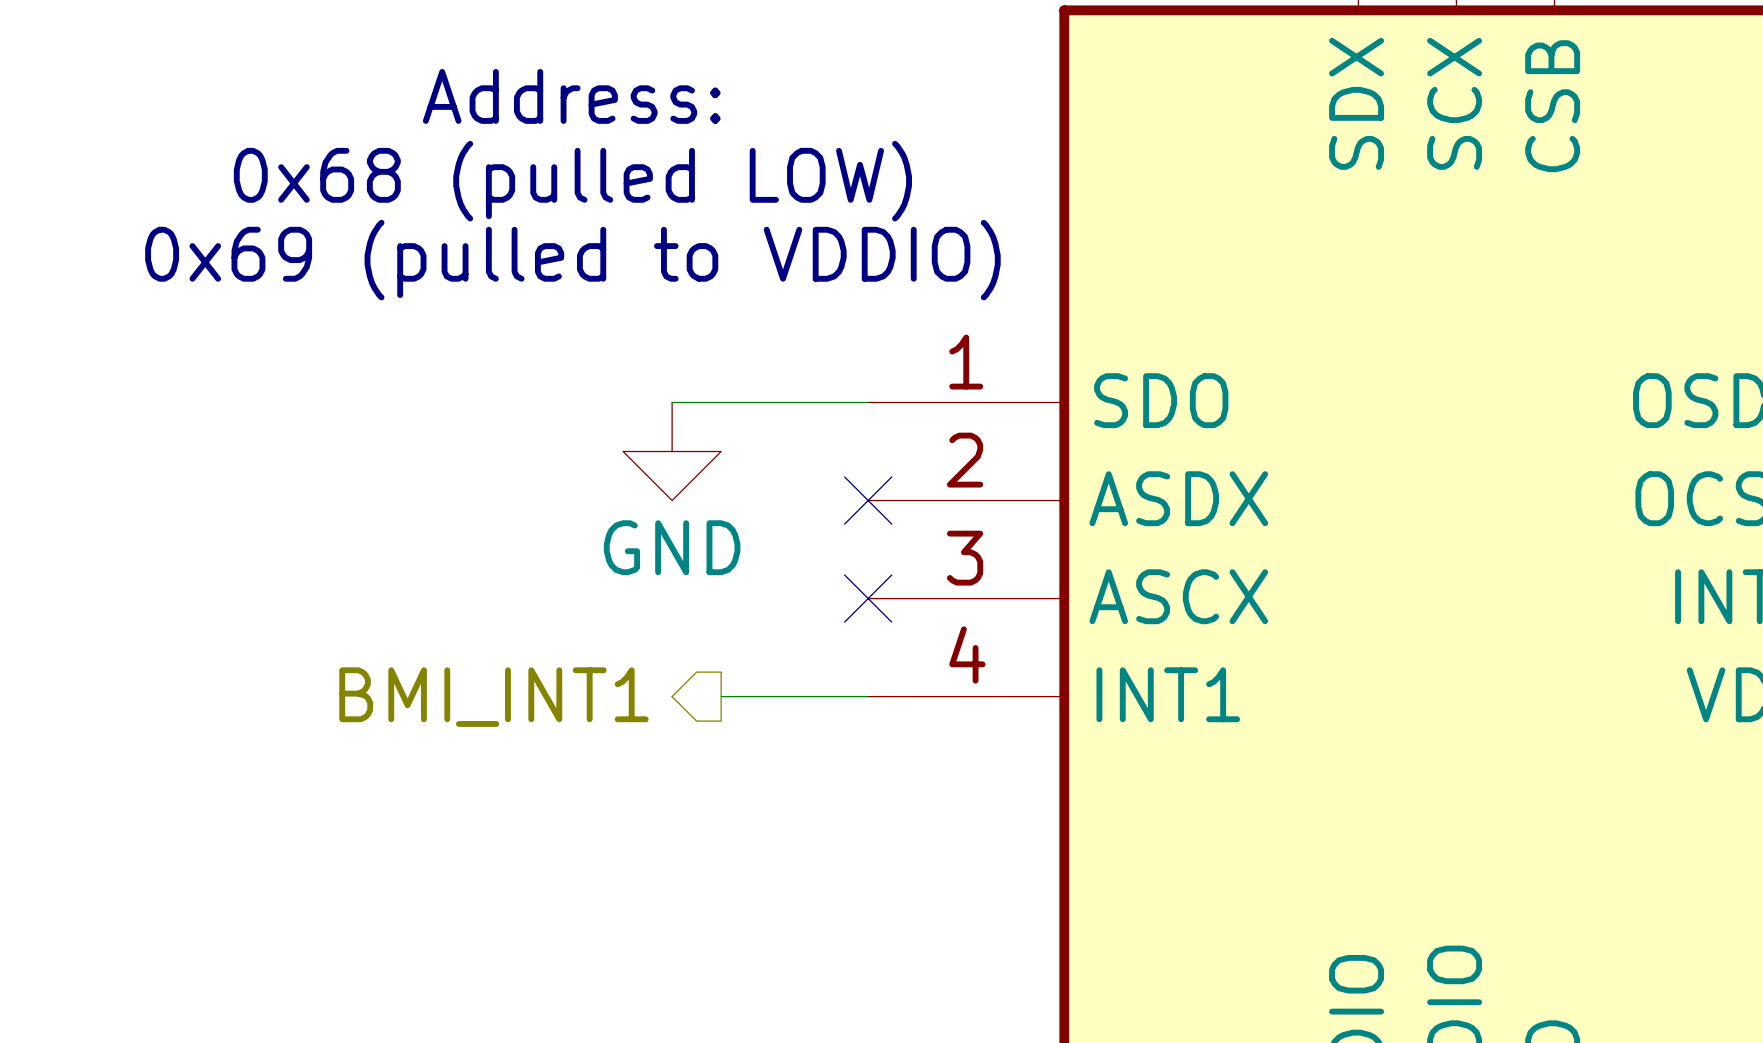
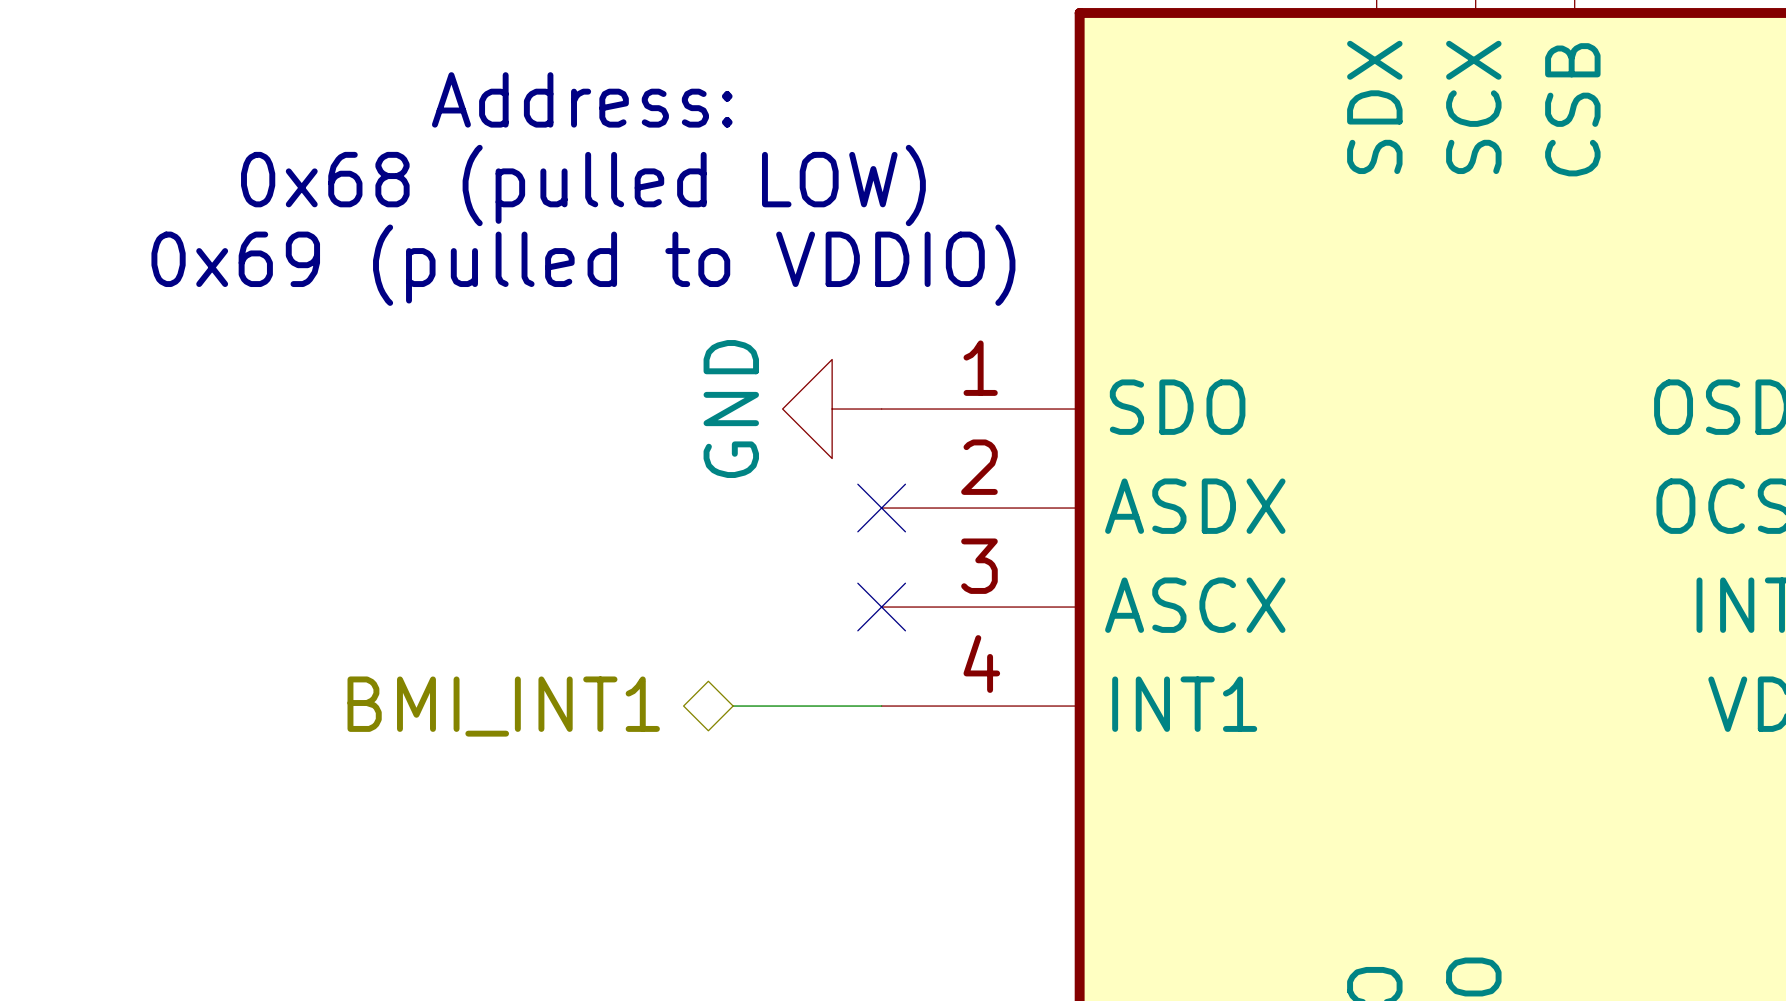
wire: (672, 402) (868, 402) -> none
power symbol rotation: 0° (672, 451) -> 90° clockwise (832, 409)
power symbol position: GND (672, 451) -> GND (832, 409)
hierarchical label shape: output (493, 697) -> bidirectional (503, 706)

